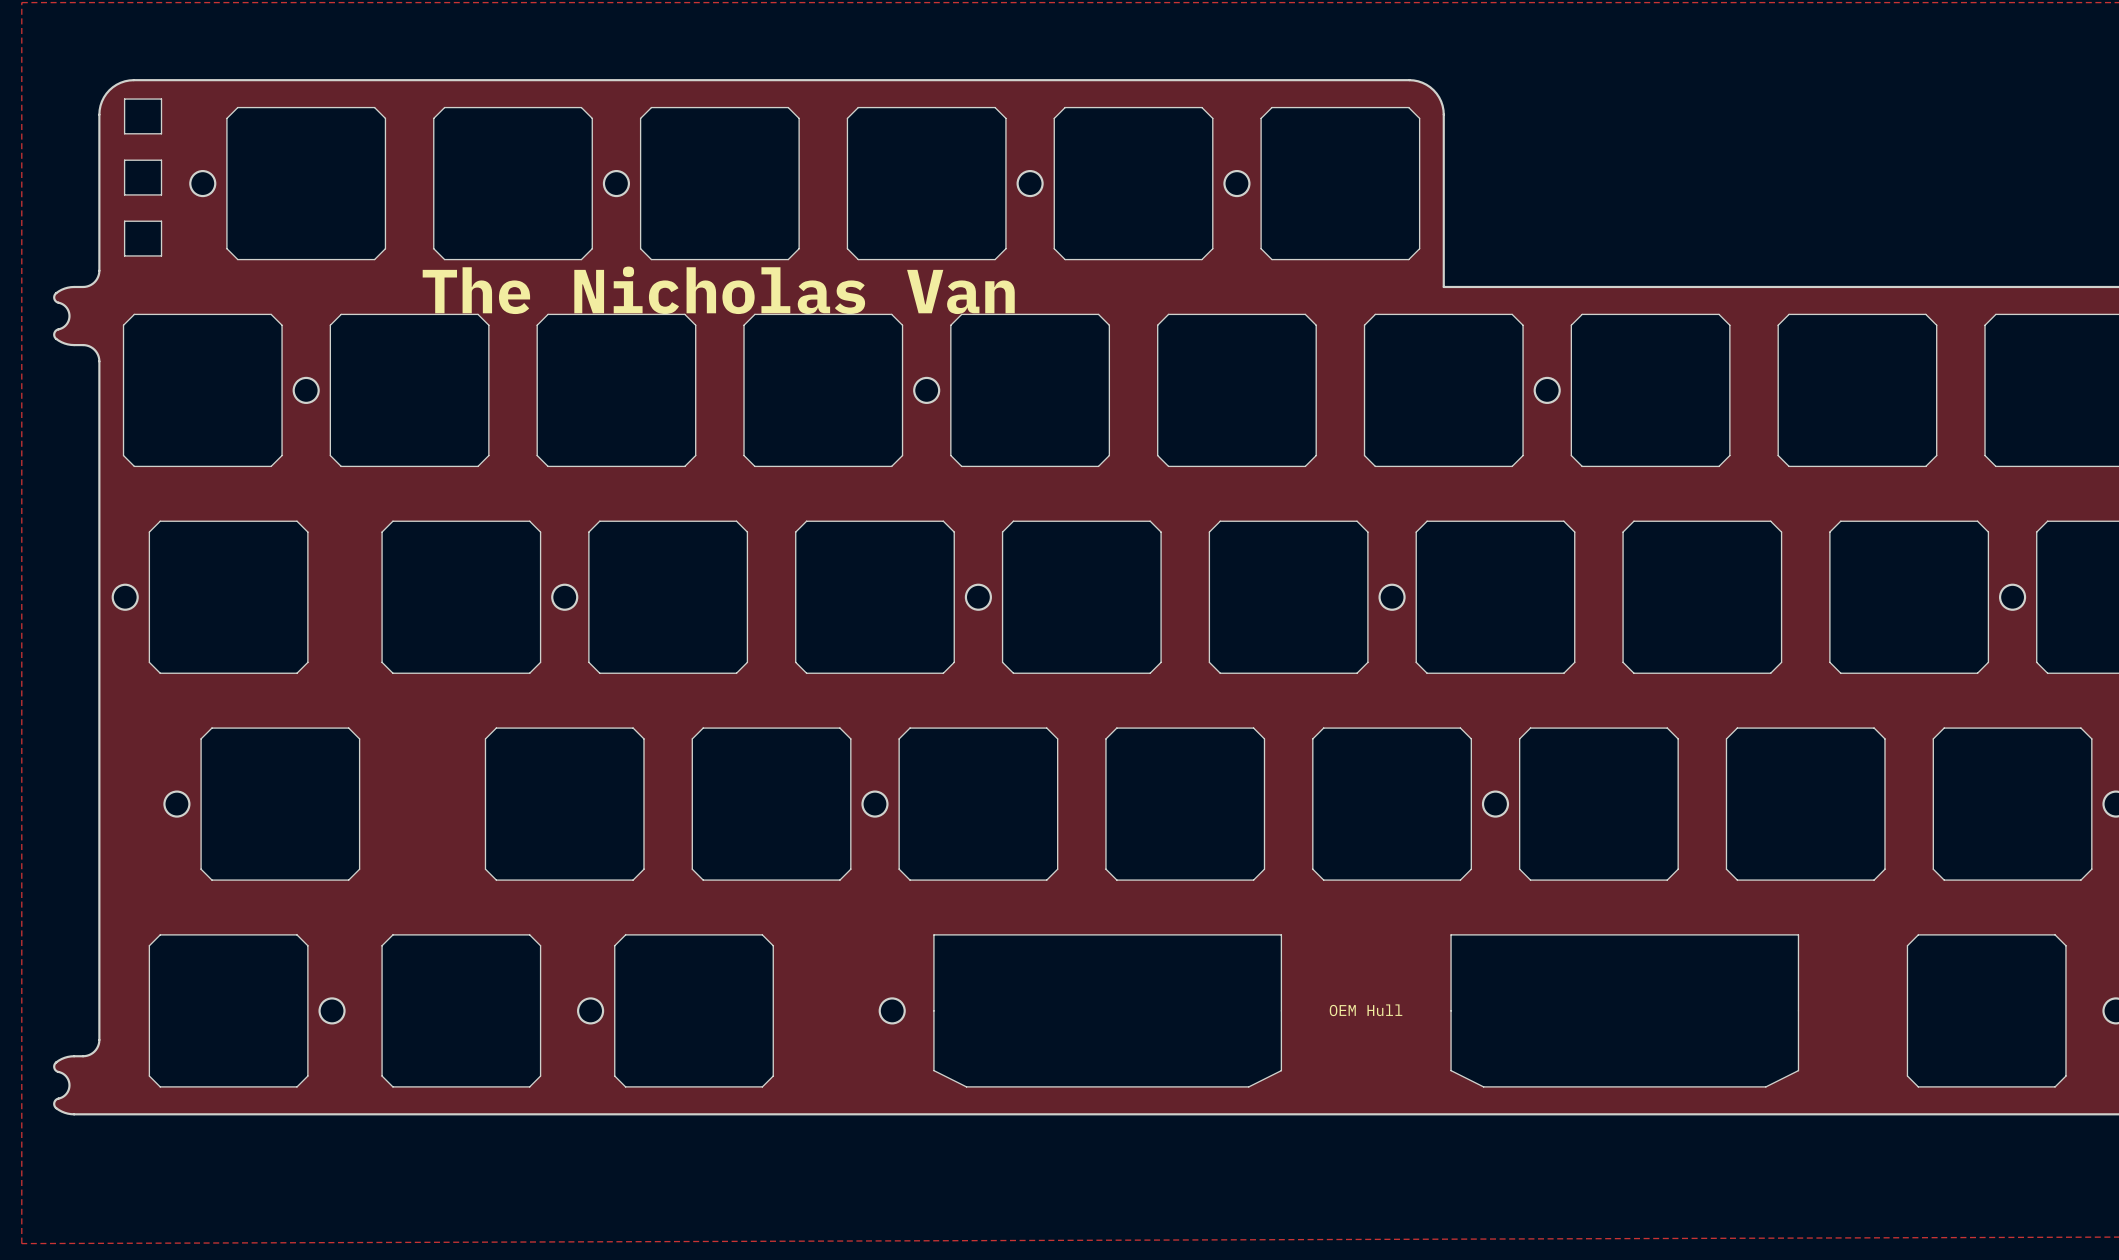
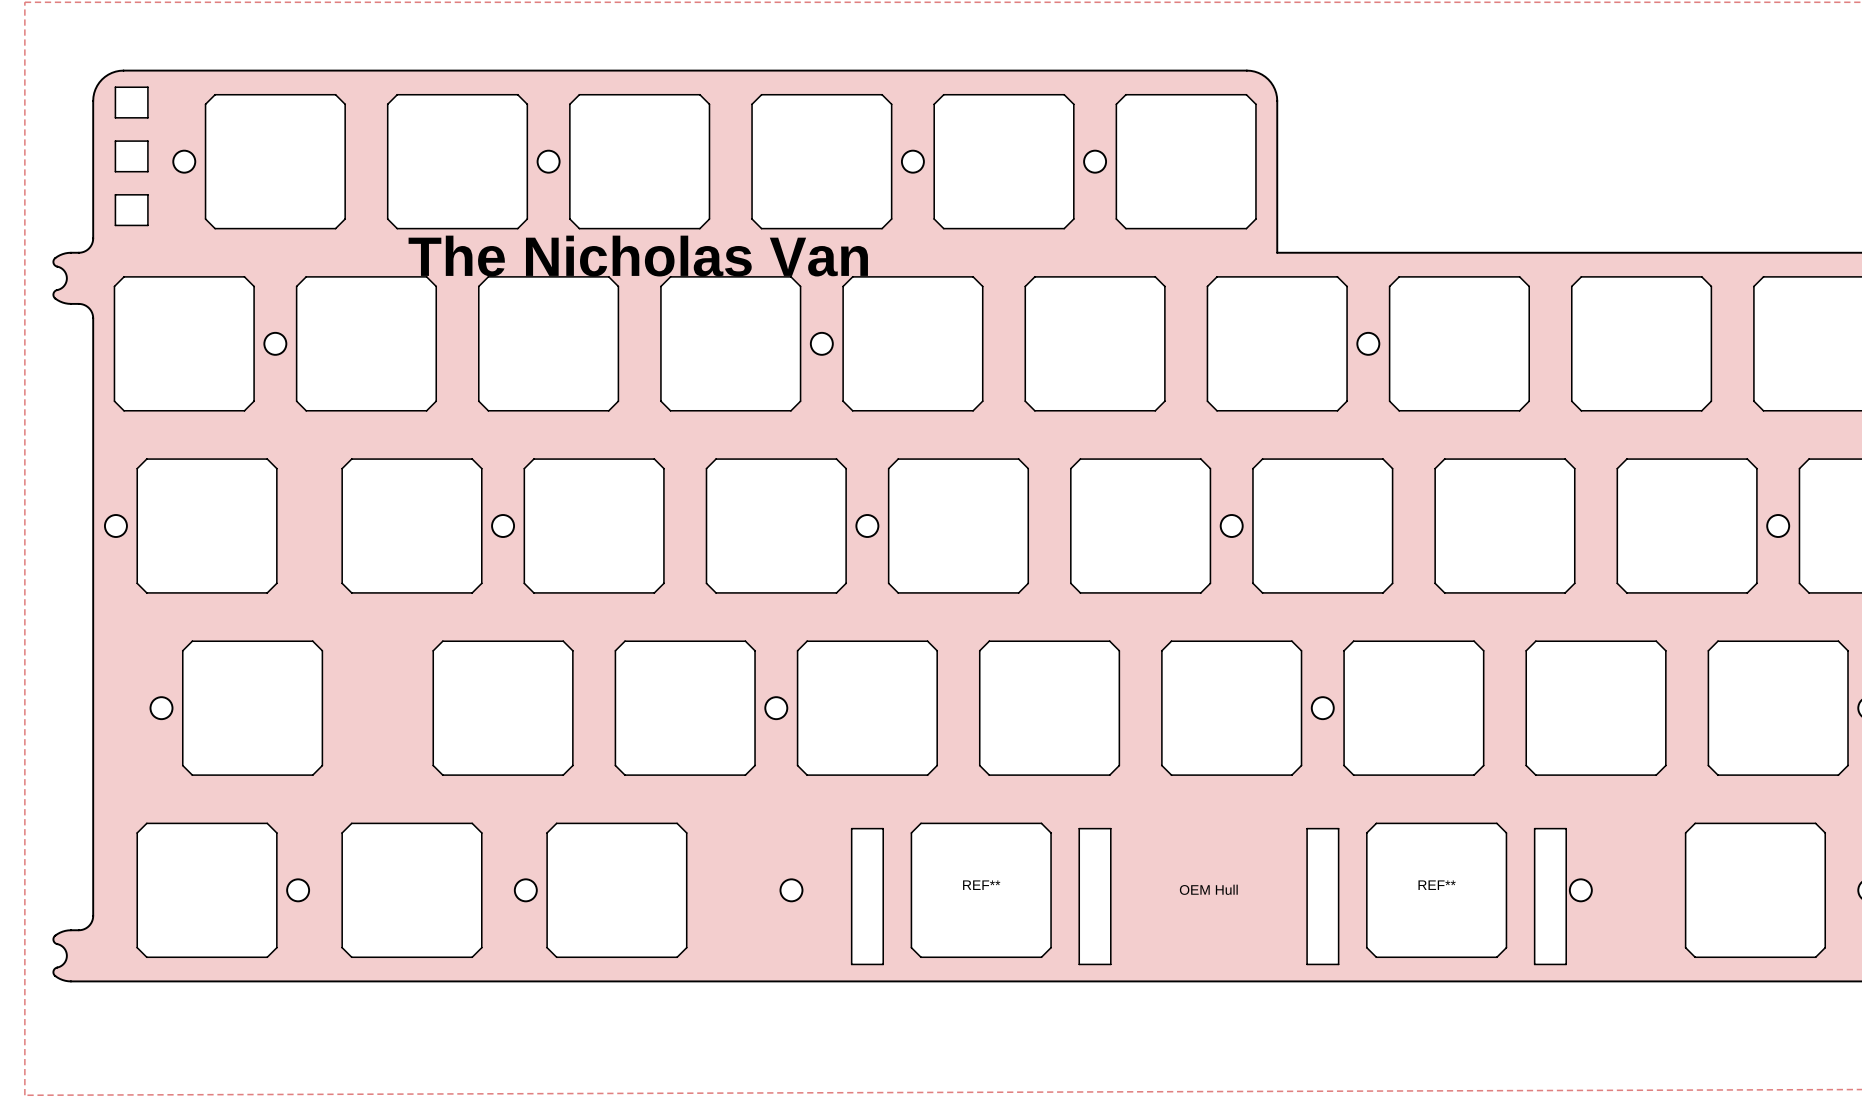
drawing shape: [933, 934, 1283, 1088] -> [910, 822, 1052, 958]
drawing shape: [1450, 934, 1800, 1088] -> [1366, 822, 1508, 958]
round board edge: none -> [1568, 878, 1593, 903]
REF**: none -> (981, 896)
REF**: none -> (1436, 896)

